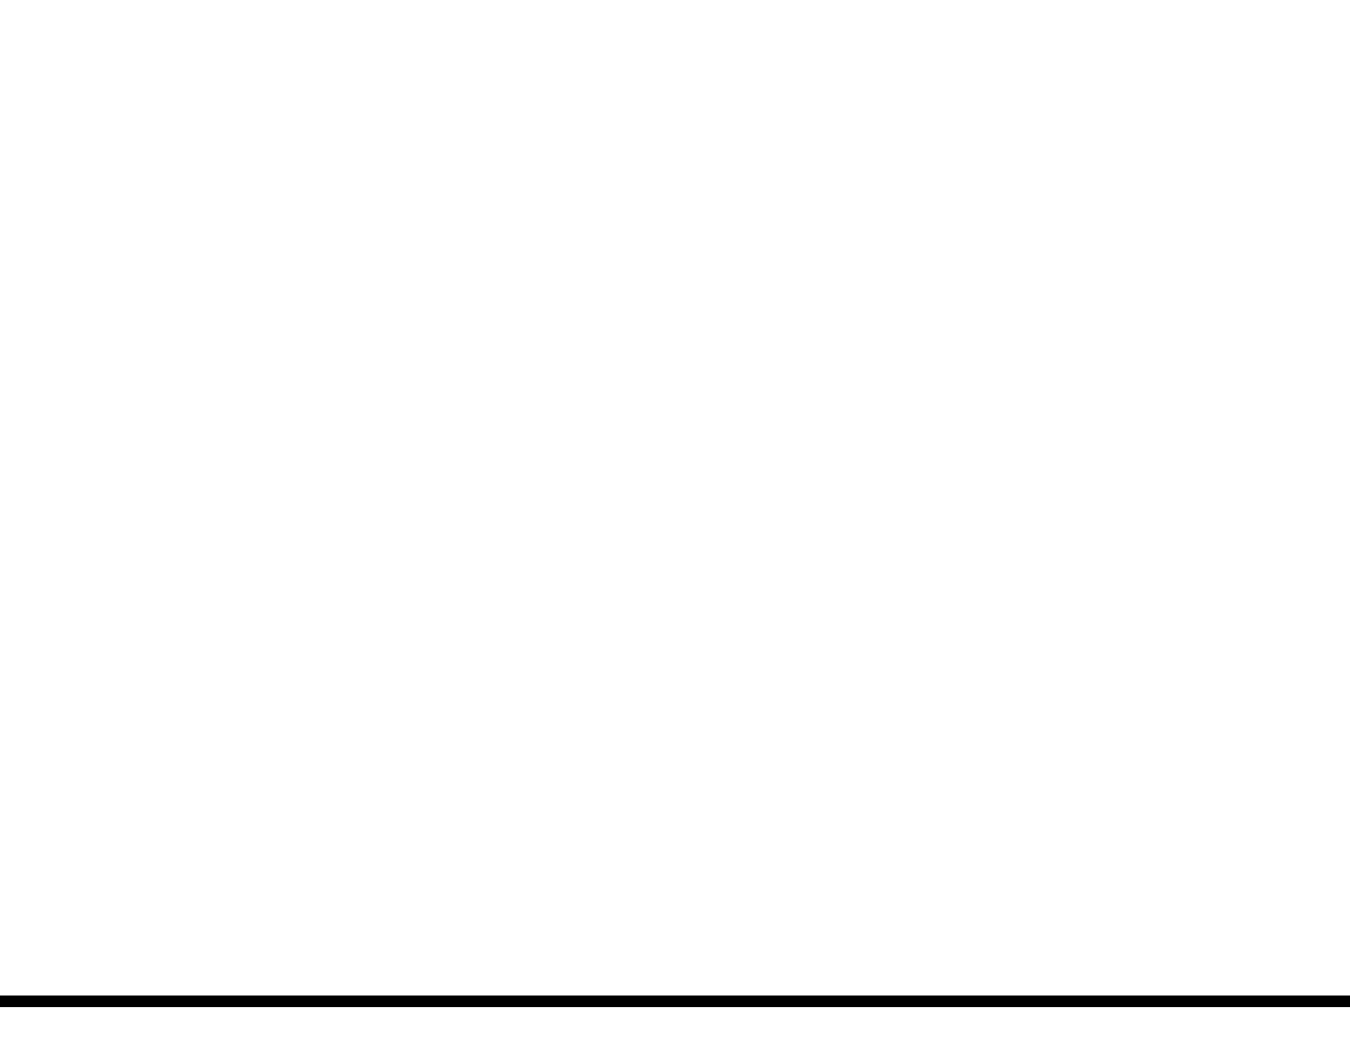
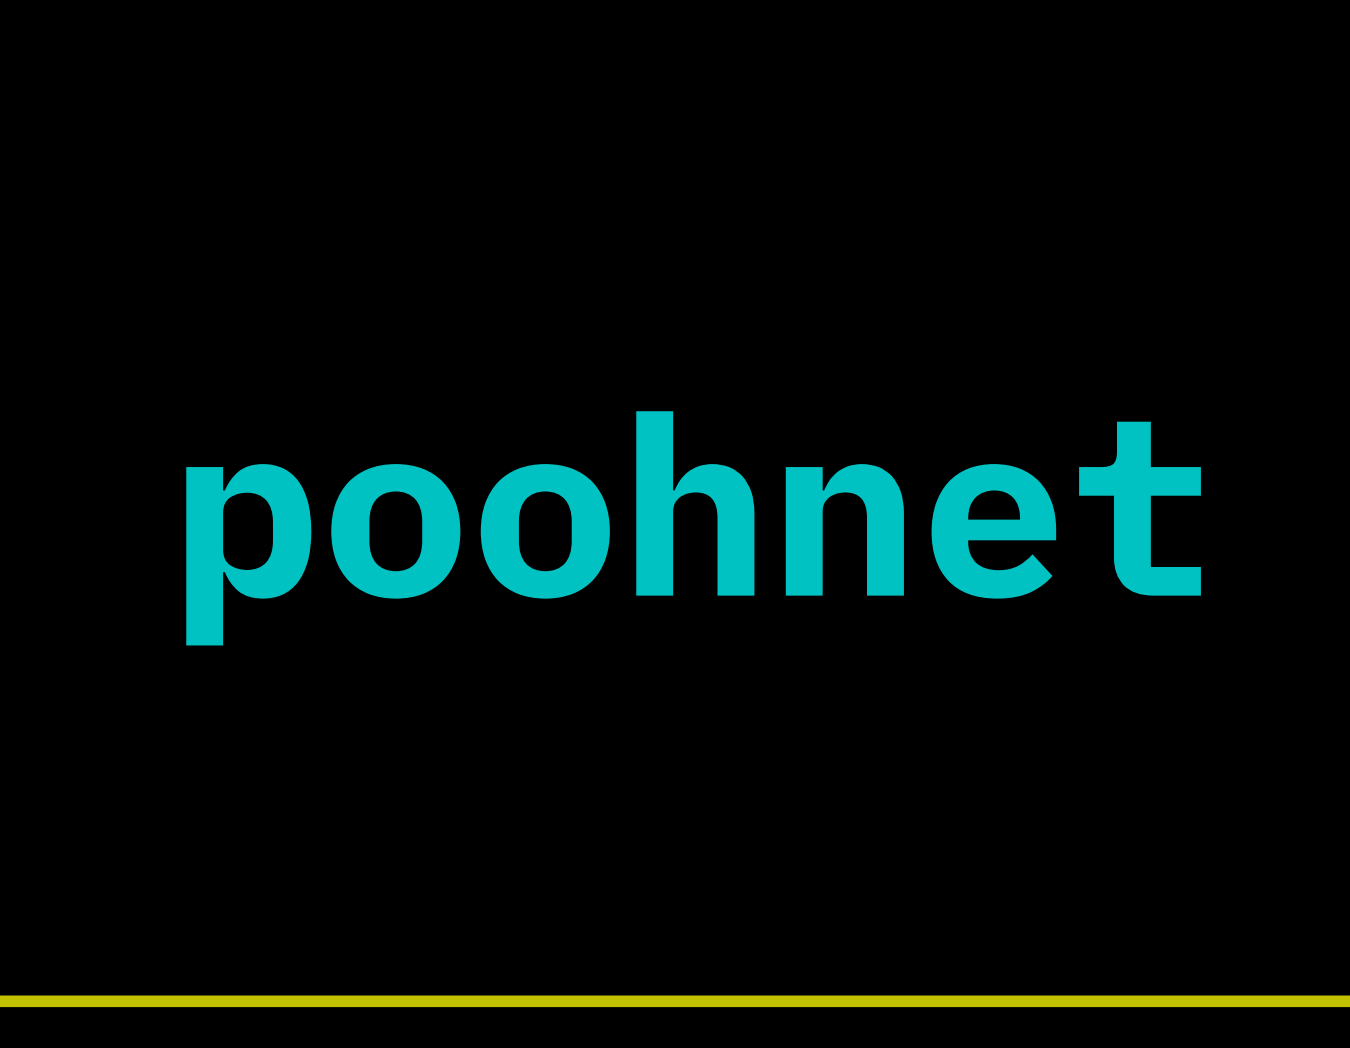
text: none -> poohnet (693, 528)

